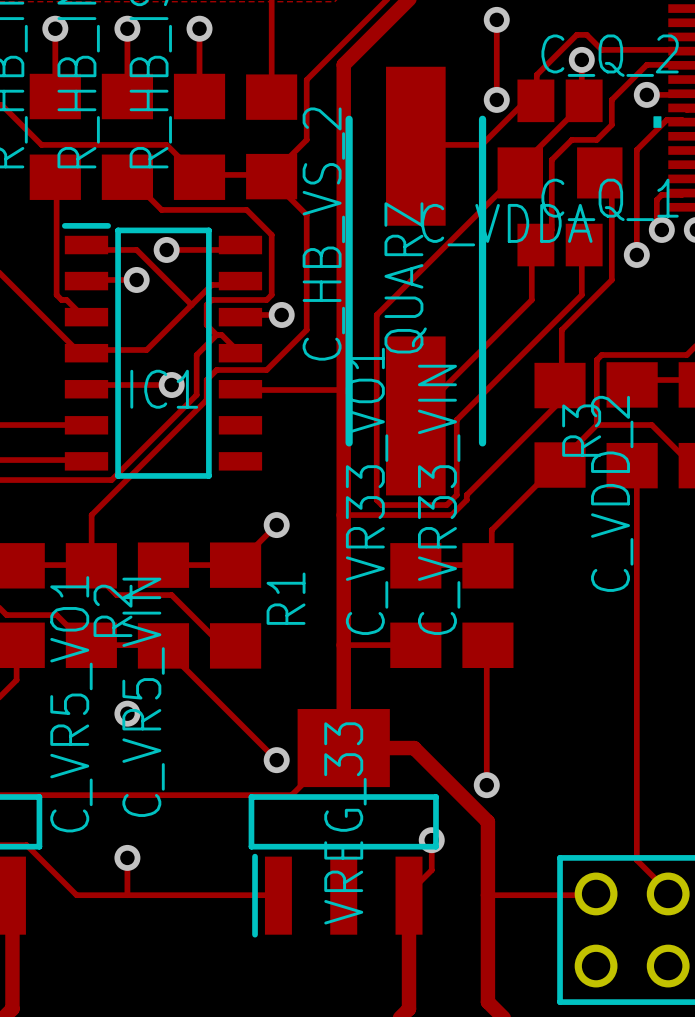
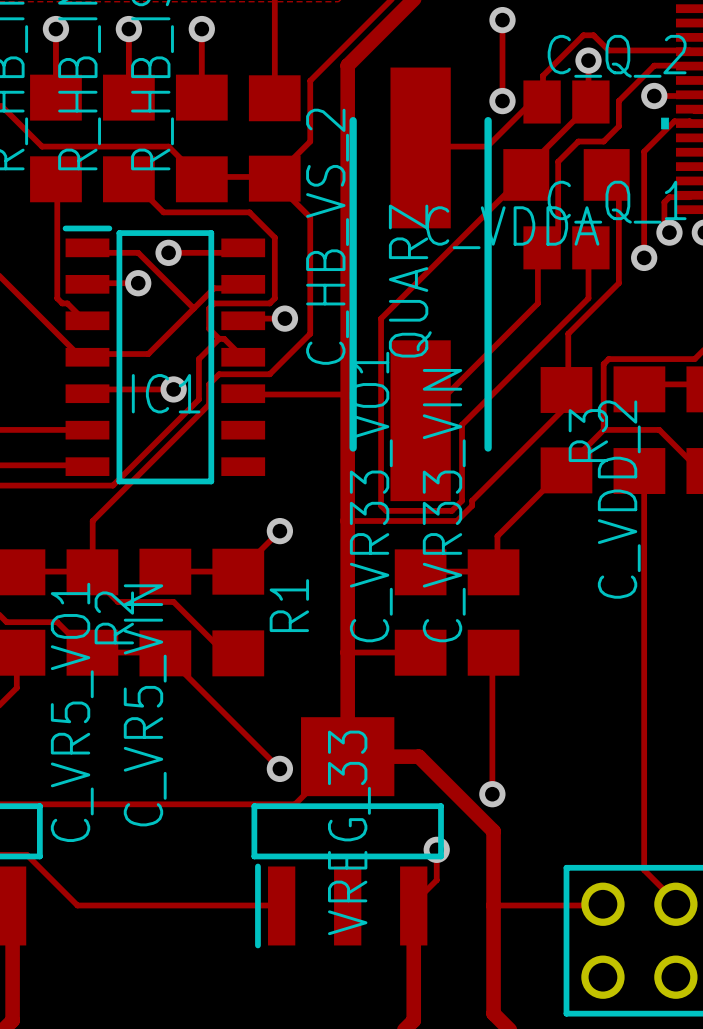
via: (127, 713) -> none
track: (127, 857) (127, 895) -> none
via: (127, 857) -> none

